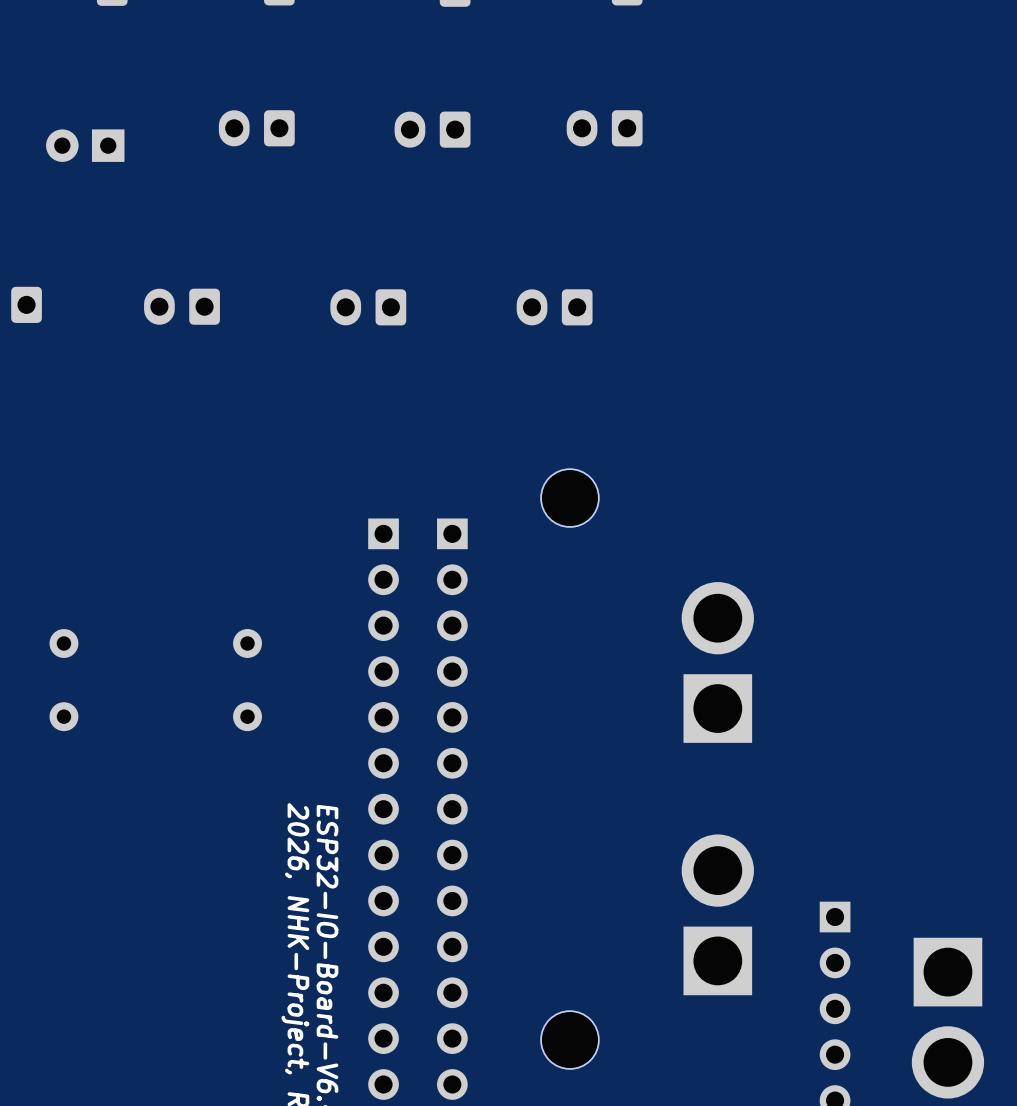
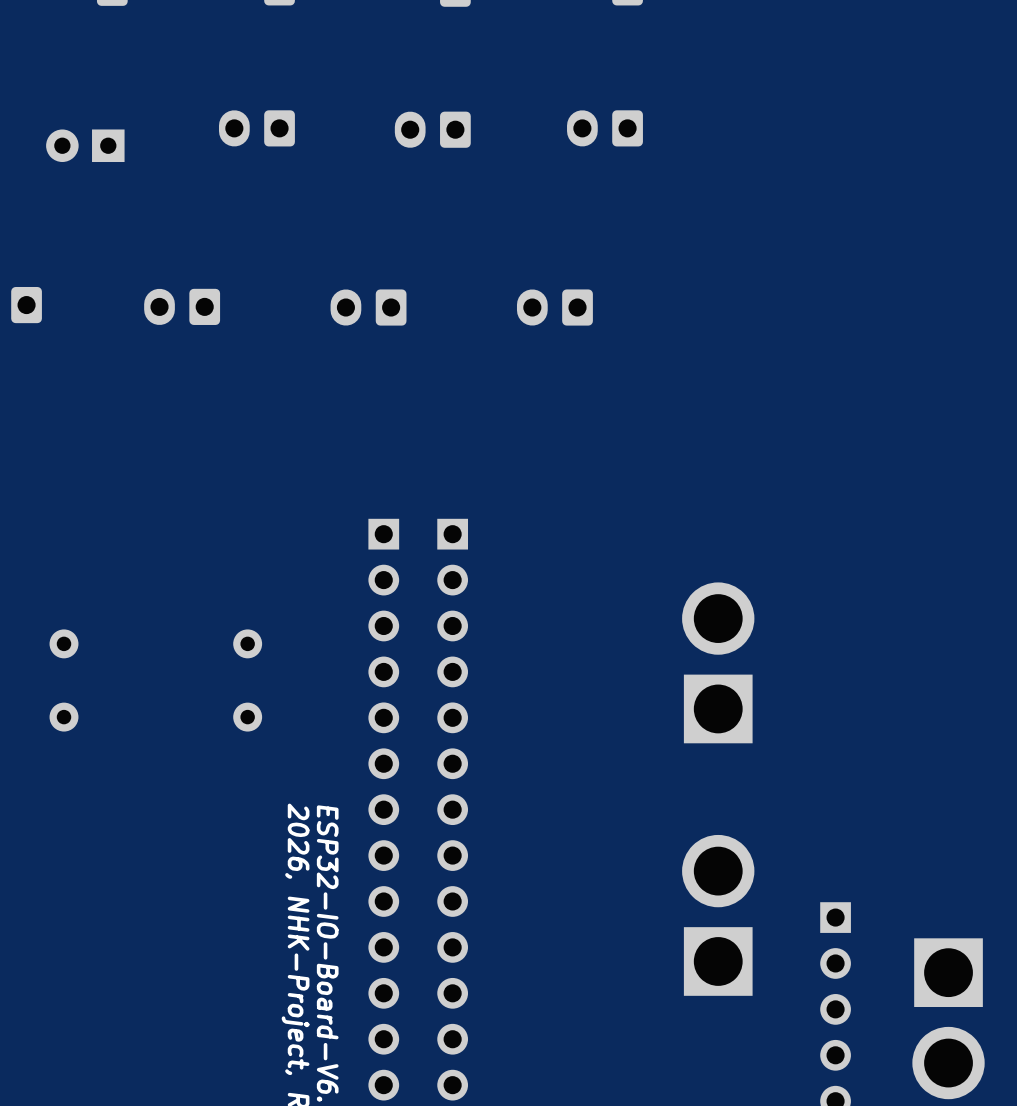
part: (569, 498) -> none
part: (569, 1040) -> none

